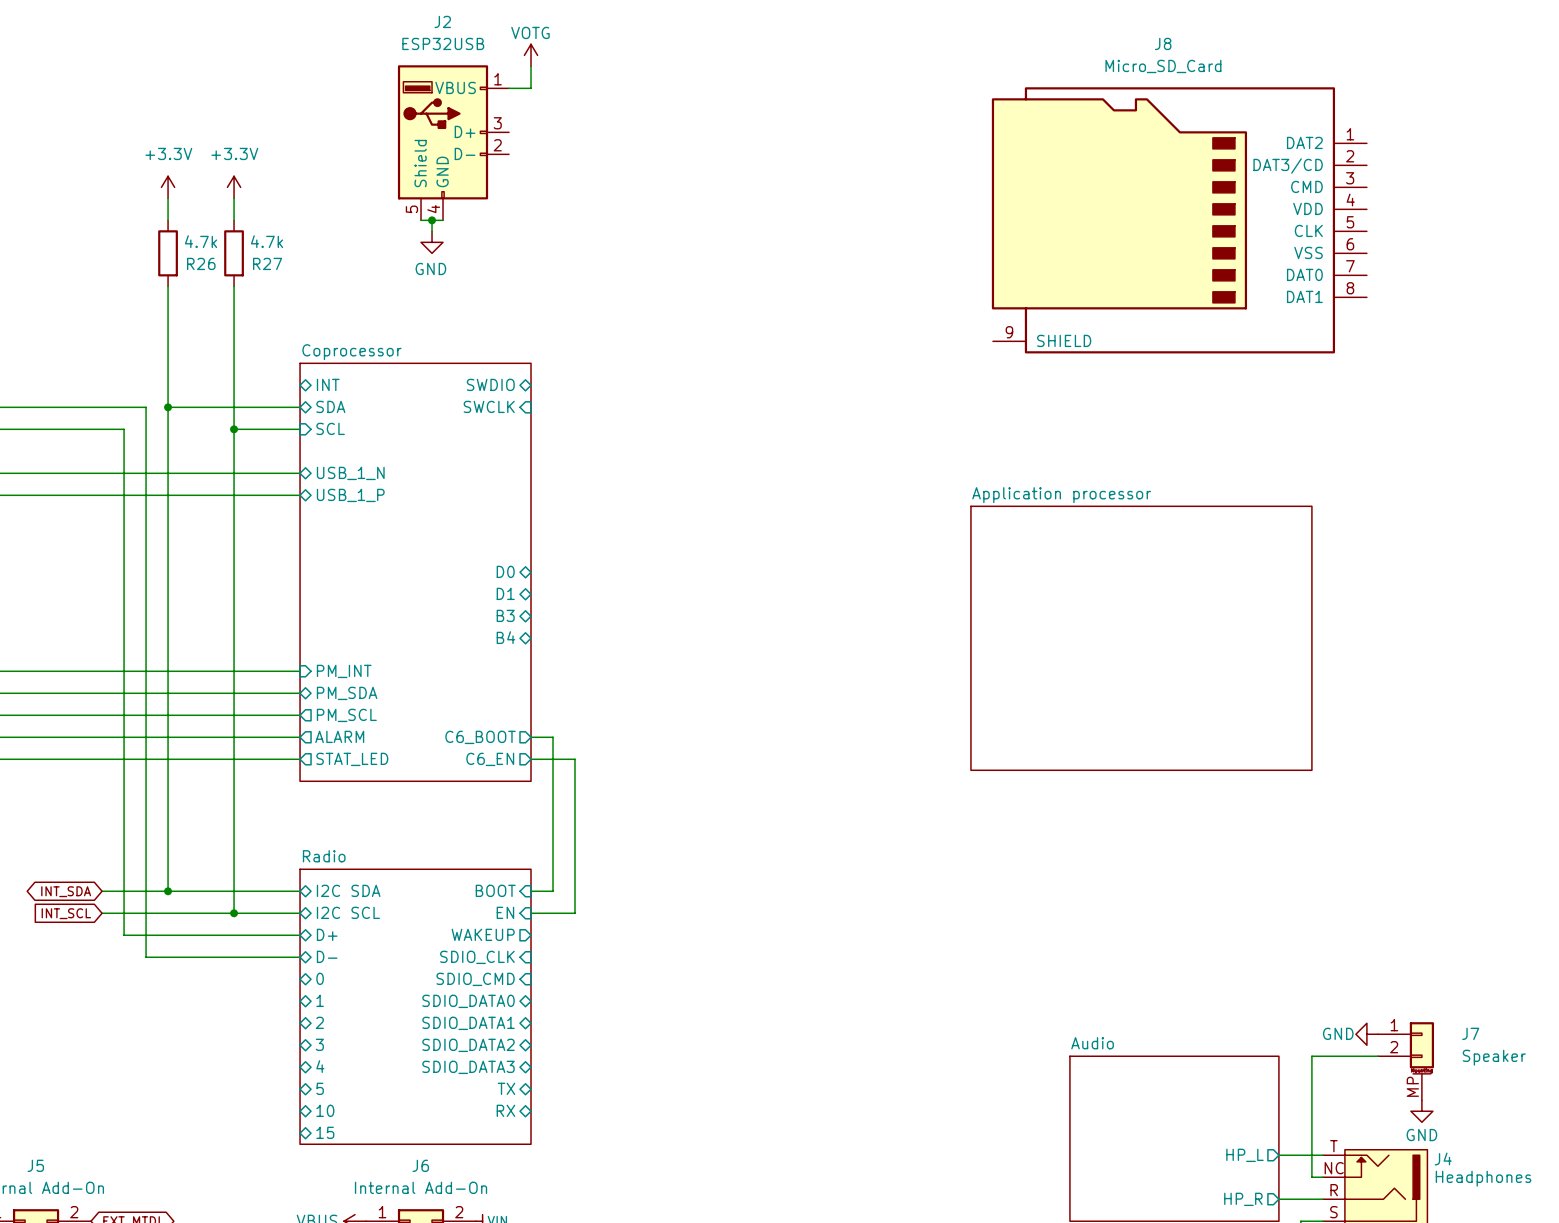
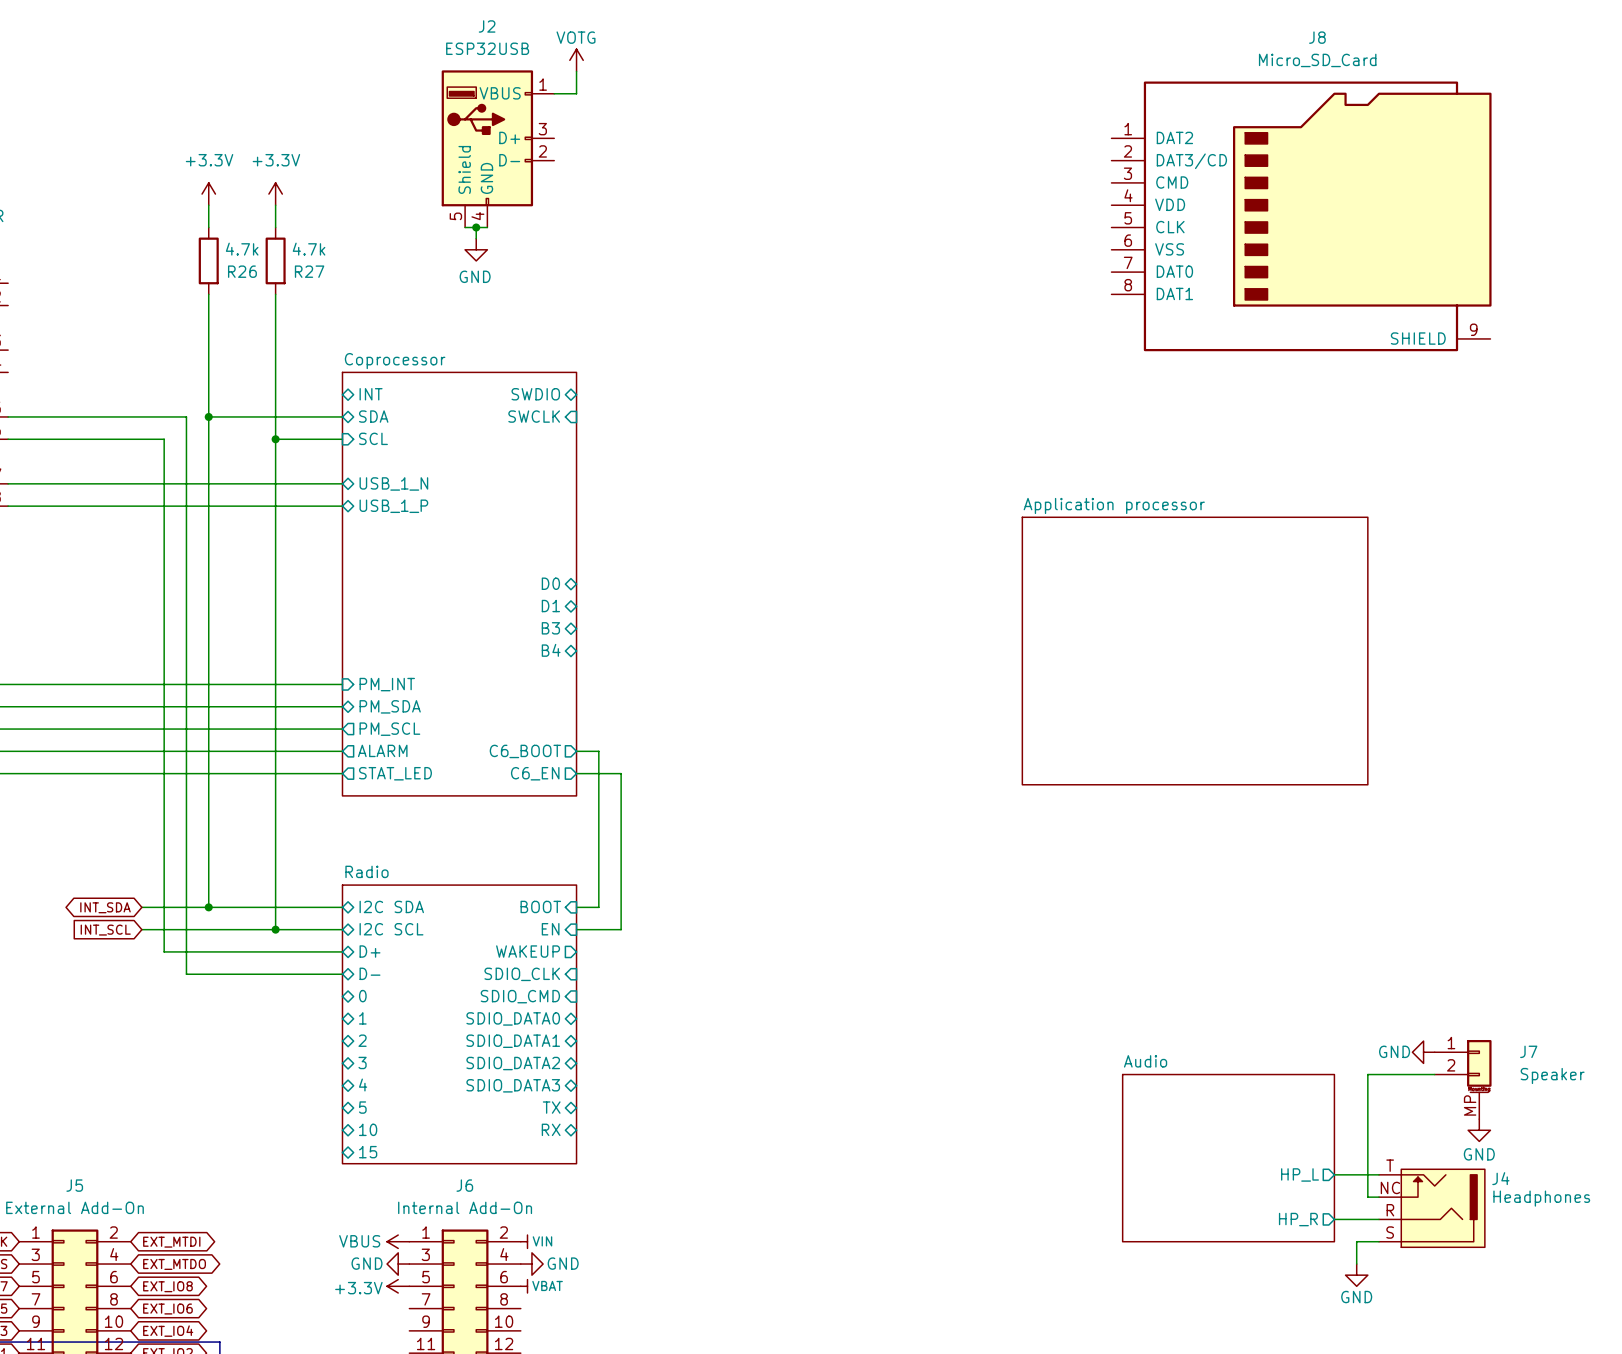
J8 flip: as is (1163, 220) -> left-right (1317, 216)

